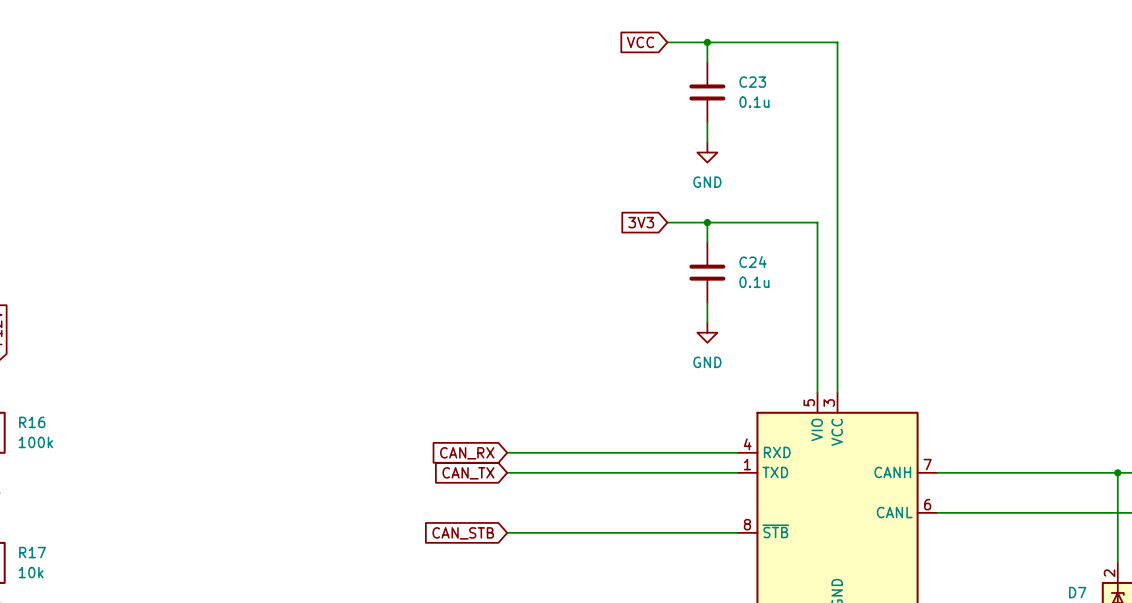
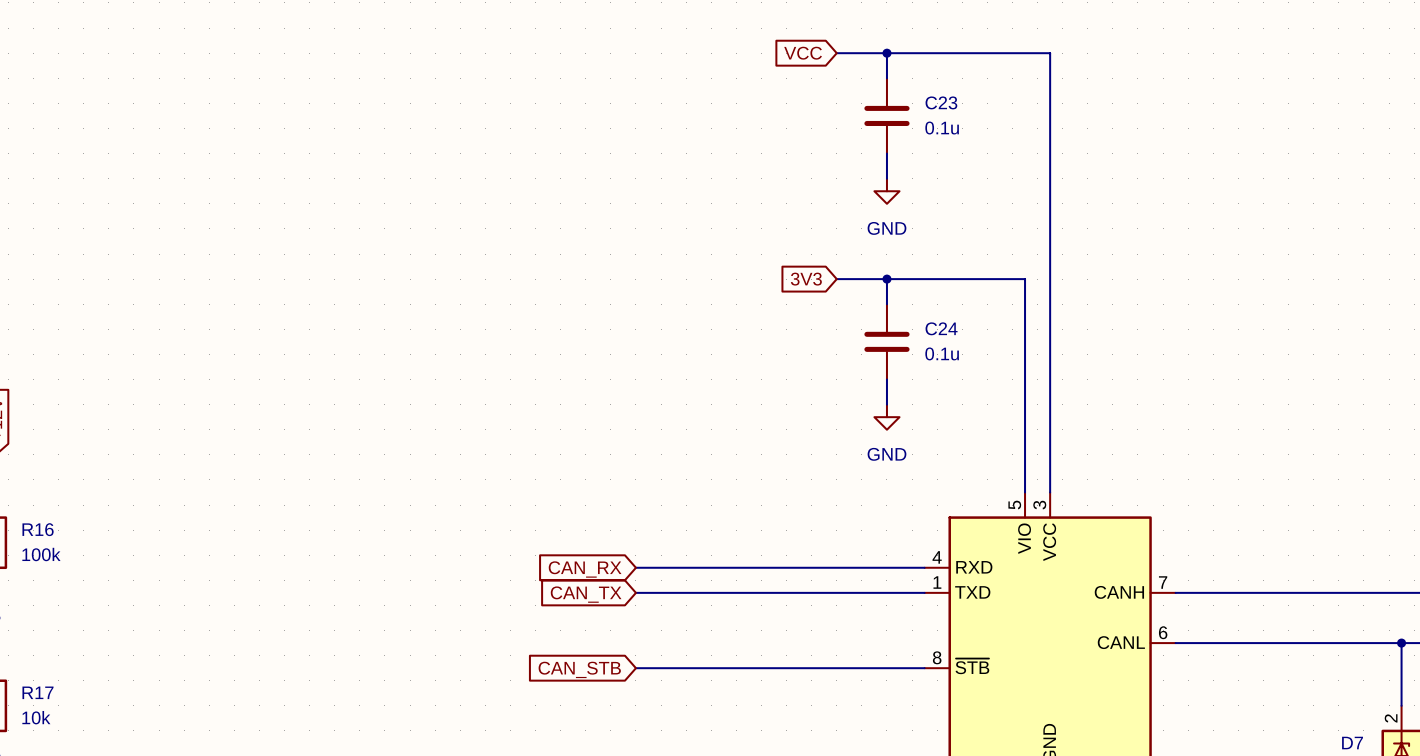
wire: (1117, 472) (1117, 512) -> none
junction position: (1117, 472) -> (1401, 643)

